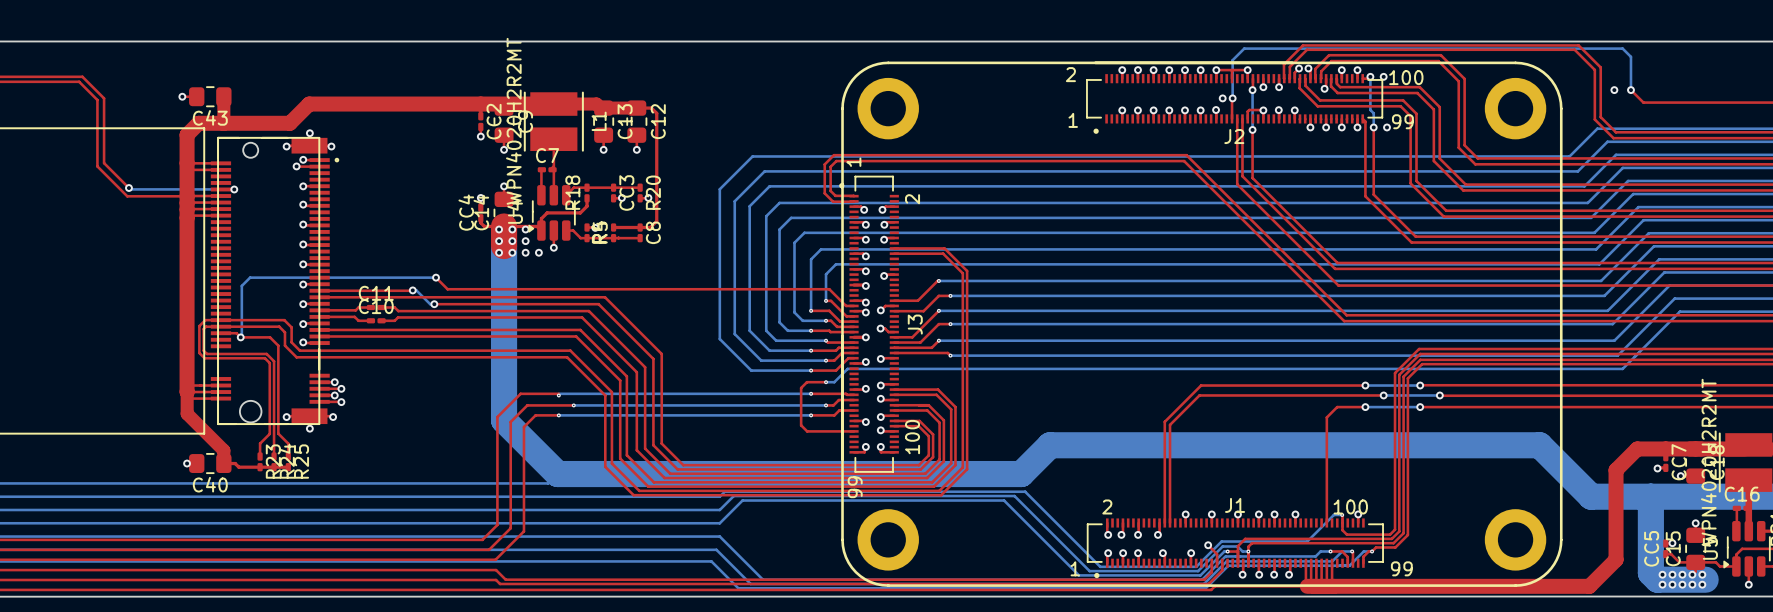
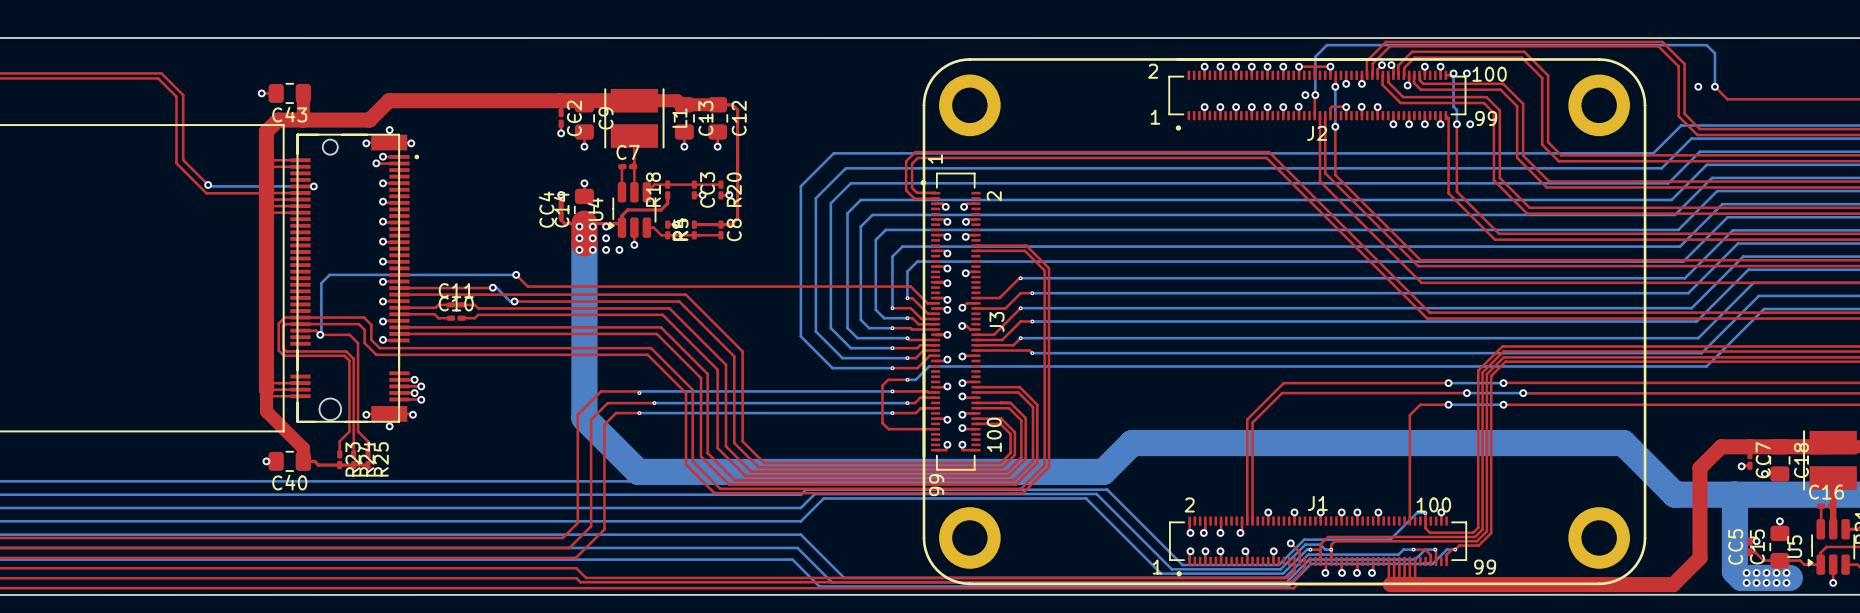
L1 value: WPN4020H2R2MT (513, 121) -> none
part value: WPN4020H2R2MT (1708, 462) -> none

